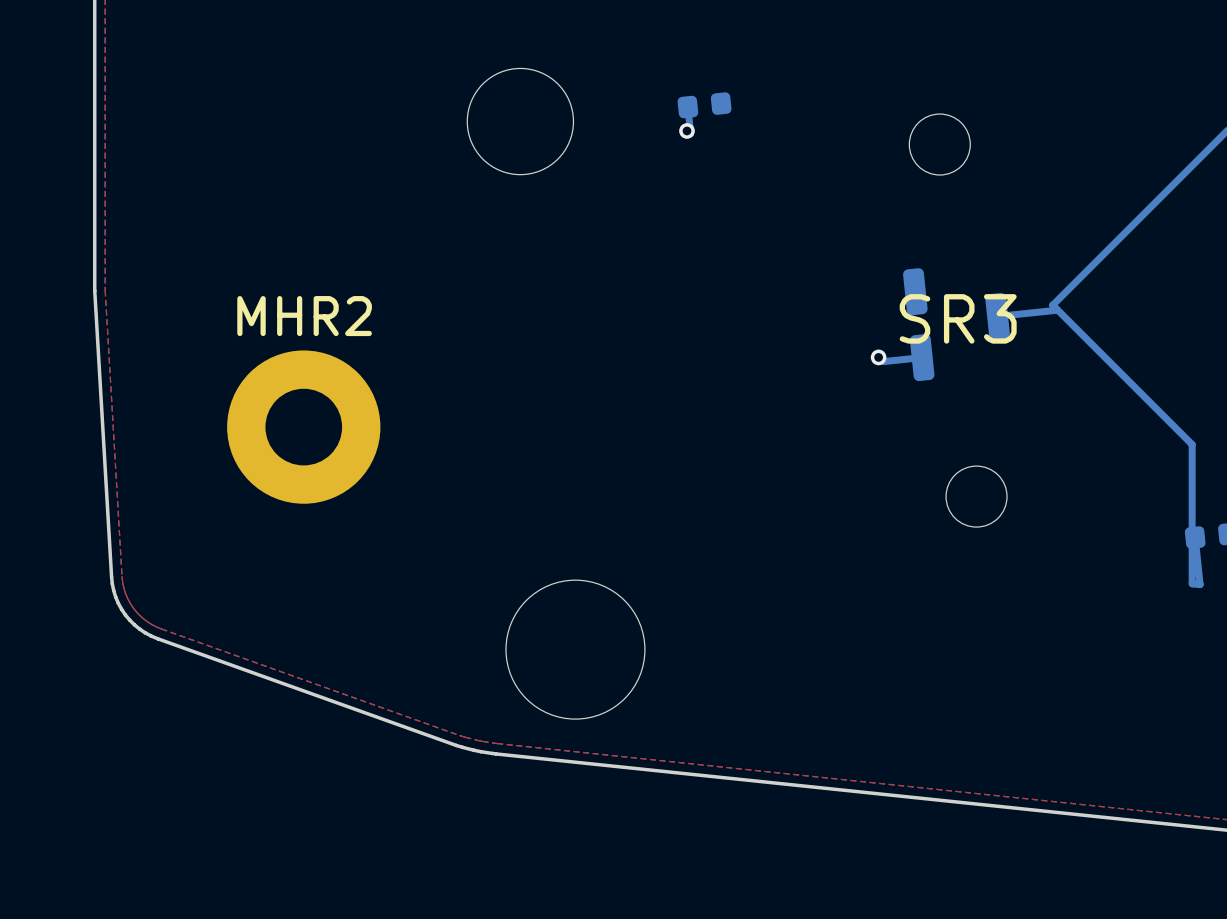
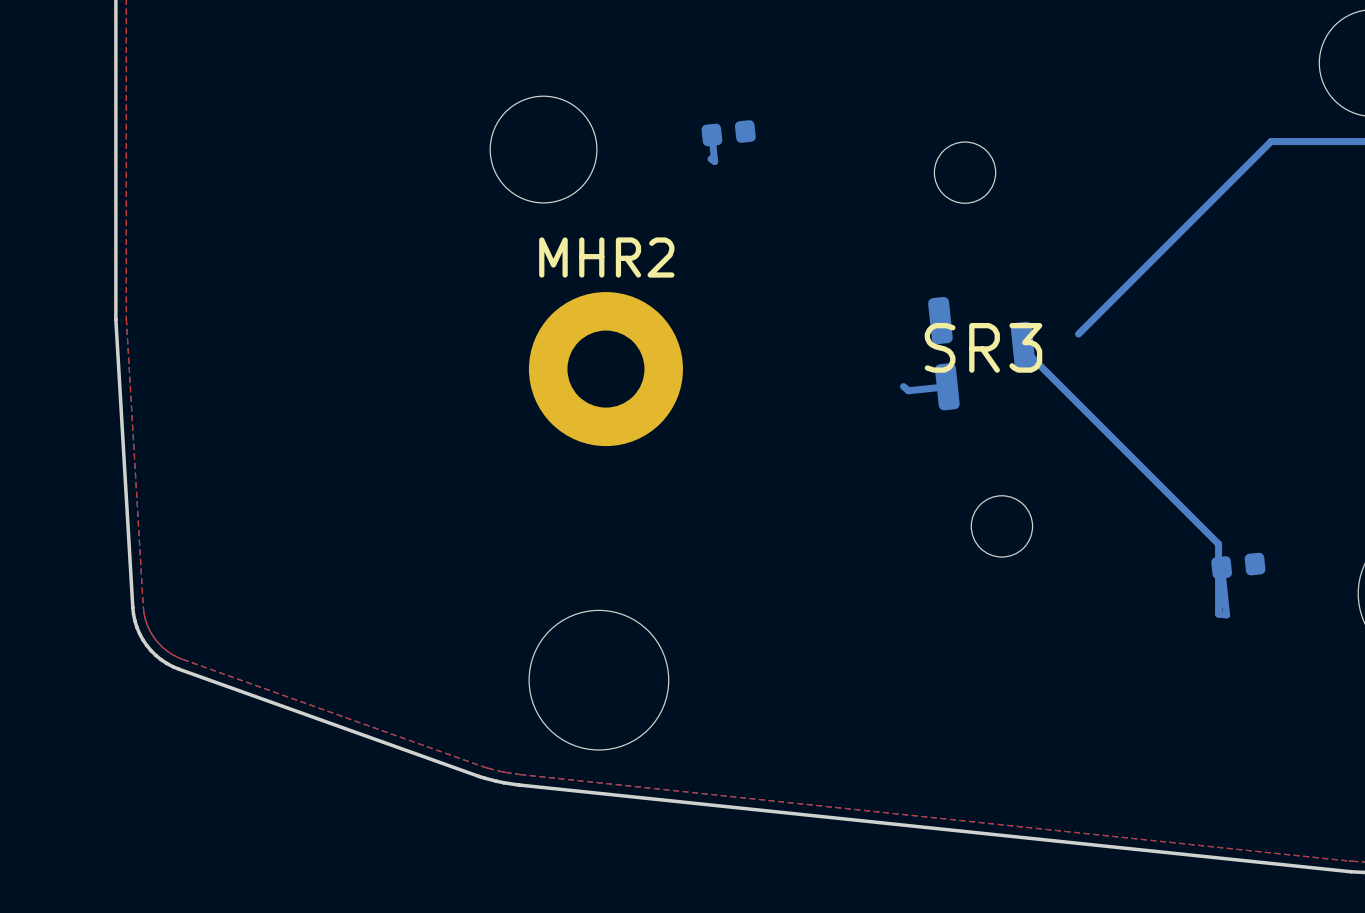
via: (686, 130) -> none
bottom track: (997, 316) (1056, 310) (1052, 305) (1192, 444) (1192, 514) -> (1023, 345) (1026, 351) (1218, 544)
via: (878, 357) -> none
MHR2 position: (303, 427) -> (605, 369)

